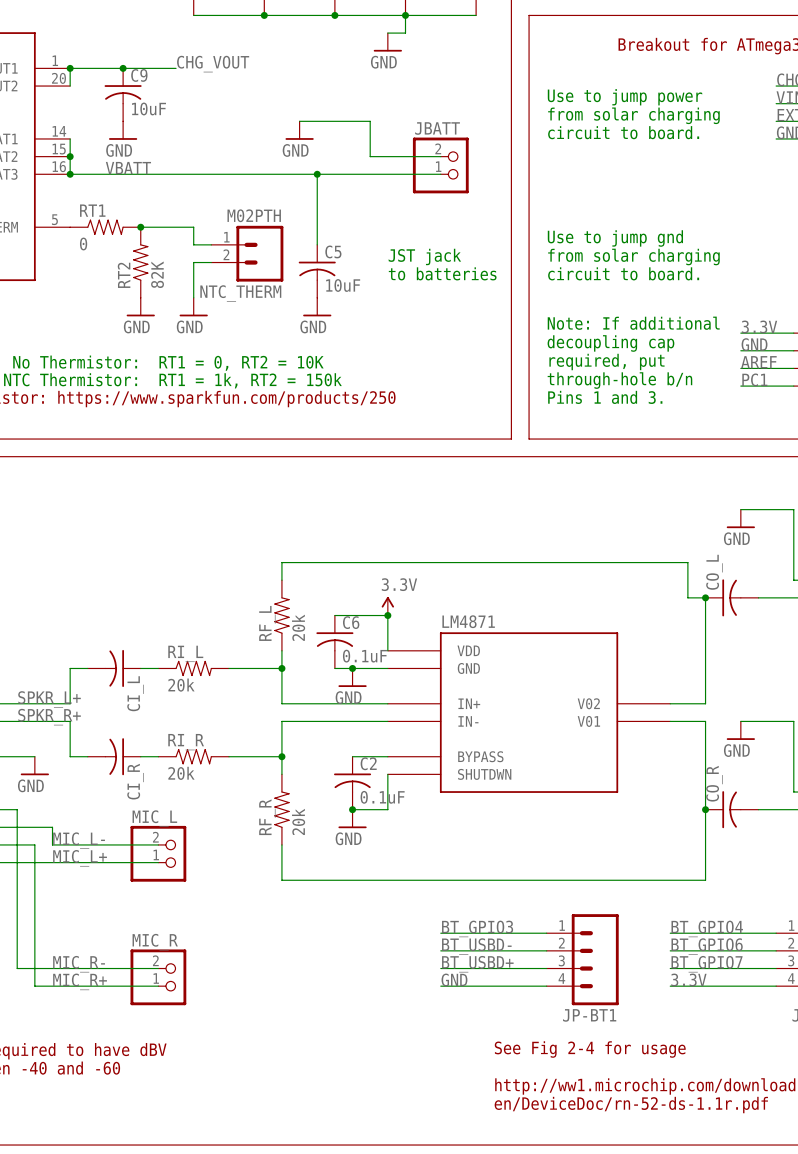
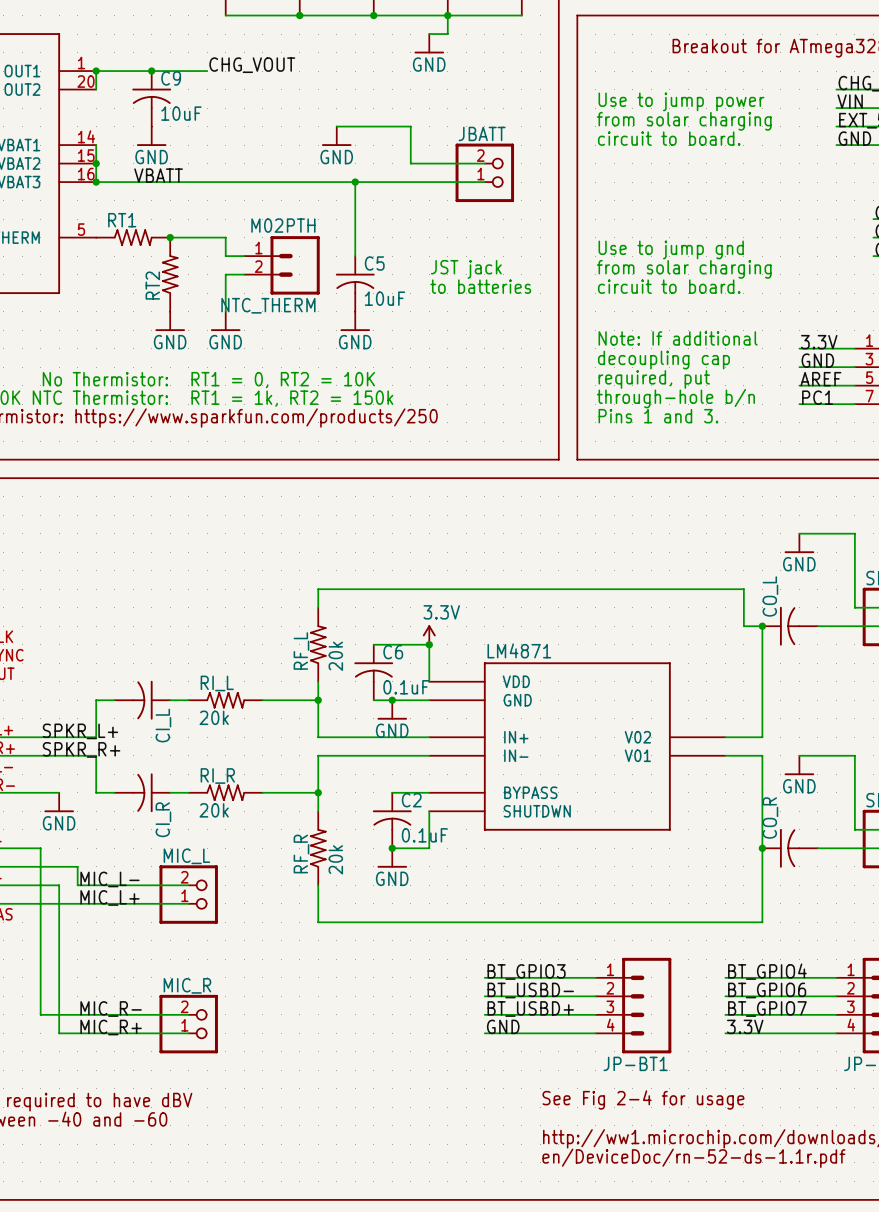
RT1 value: 0 (83, 244) -> none
RT2 value: 82K (157, 274) -> none

